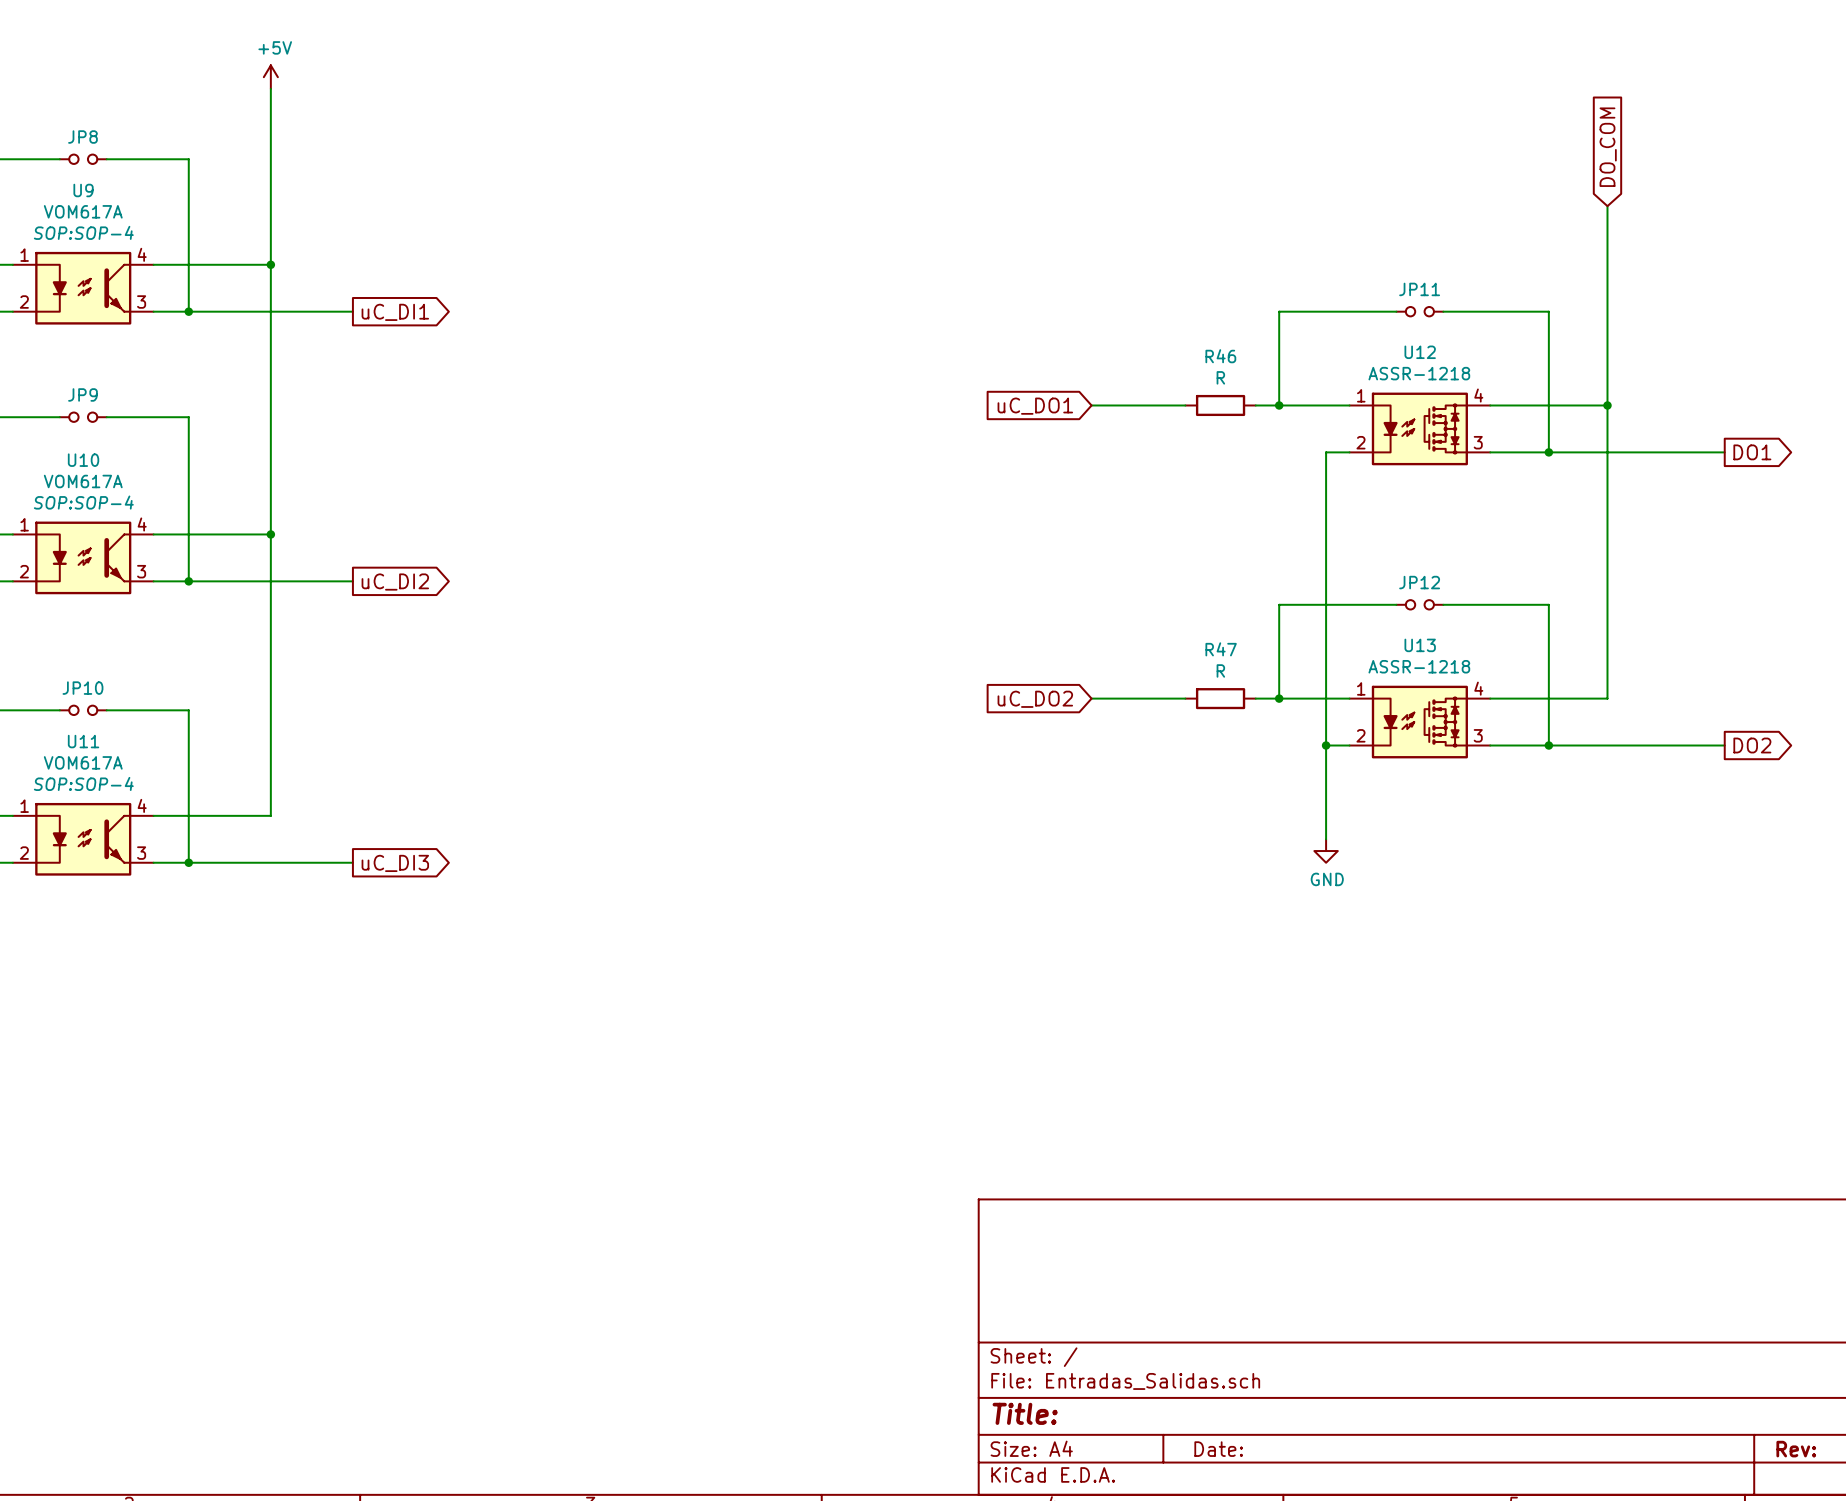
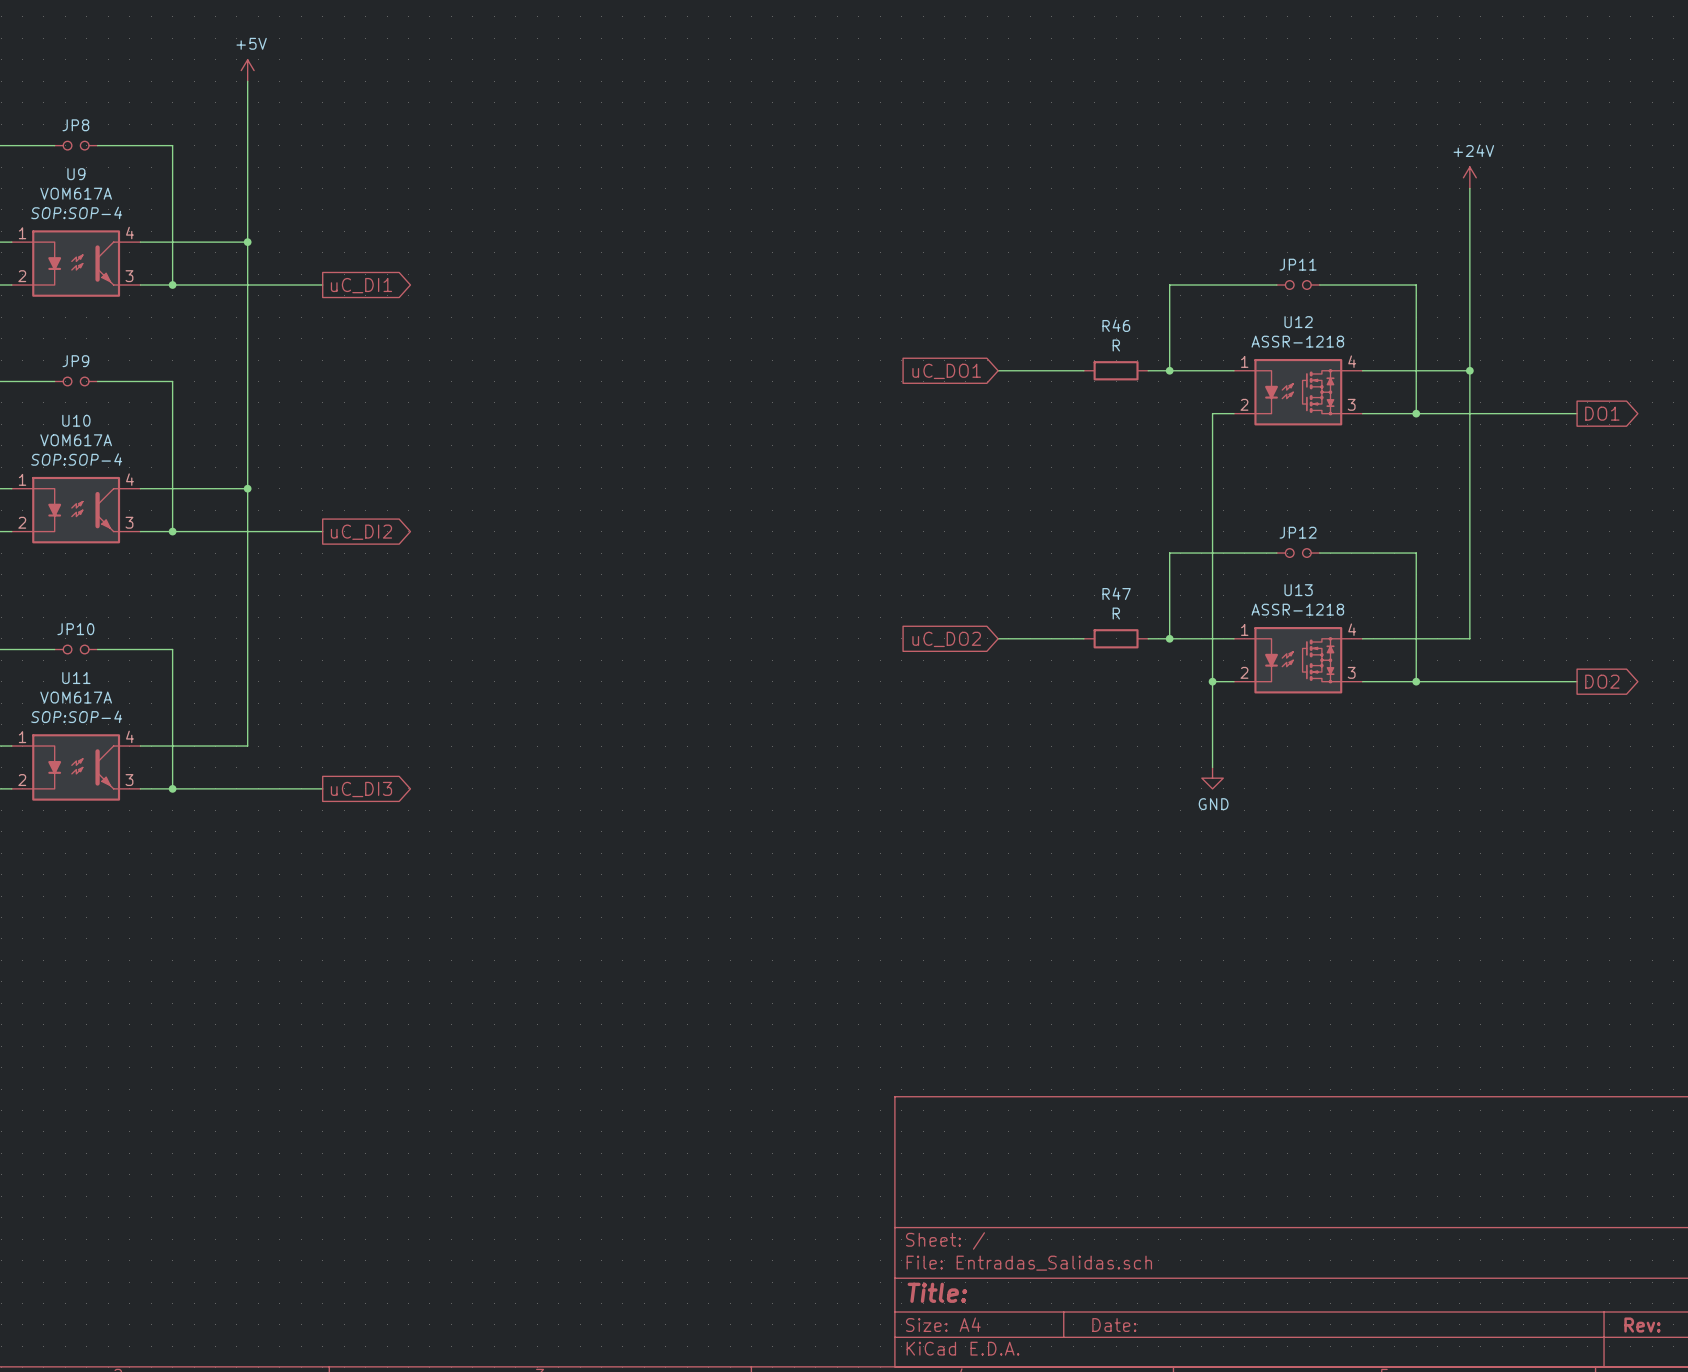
global label: DO_COM (1608, 147) -> none
power symbol: none -> +24V (1469, 177)

